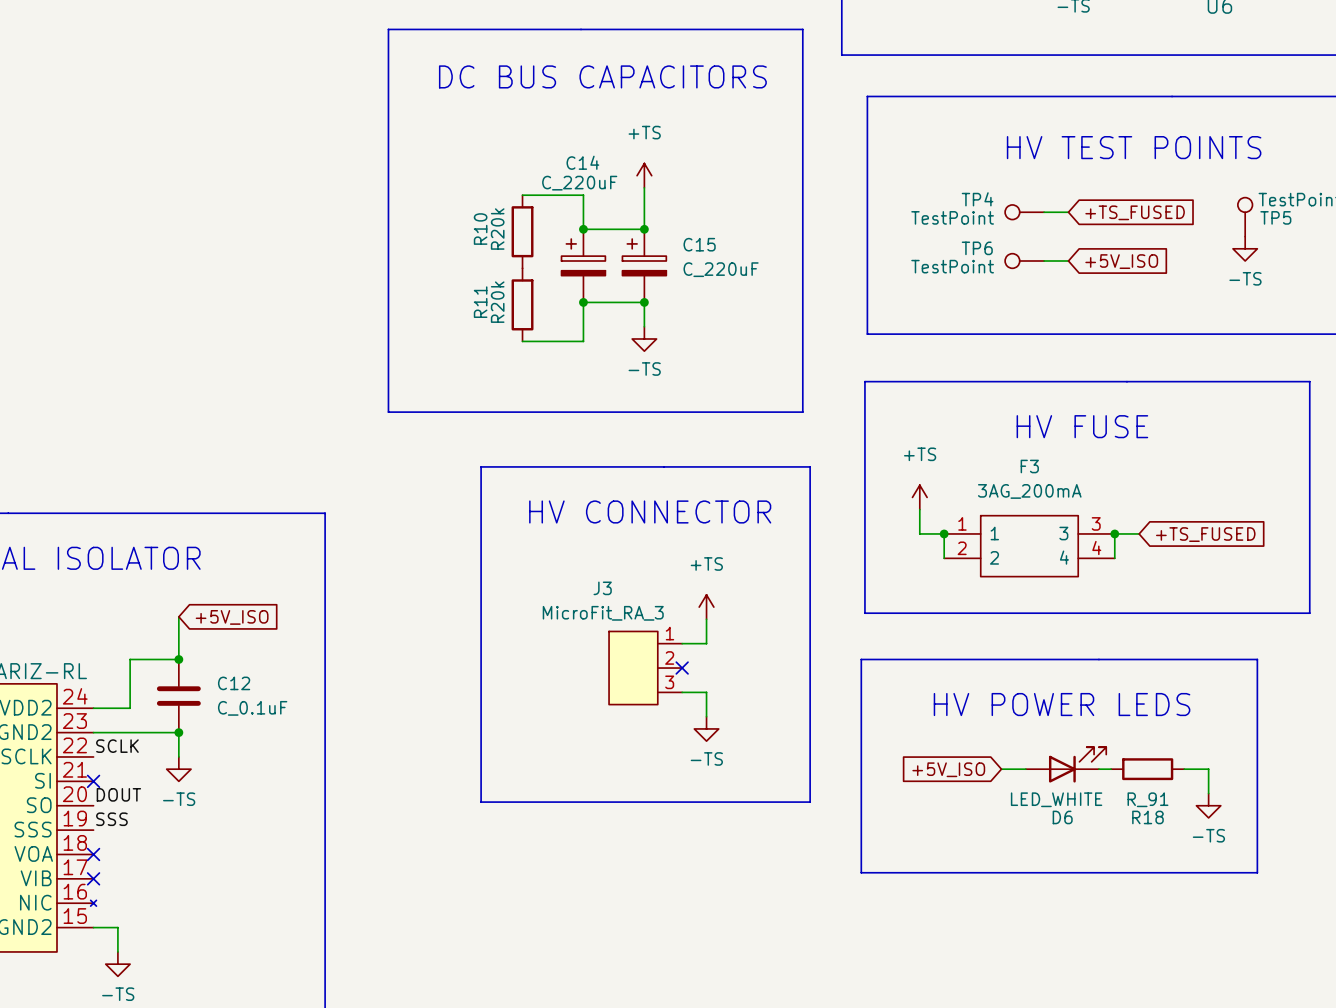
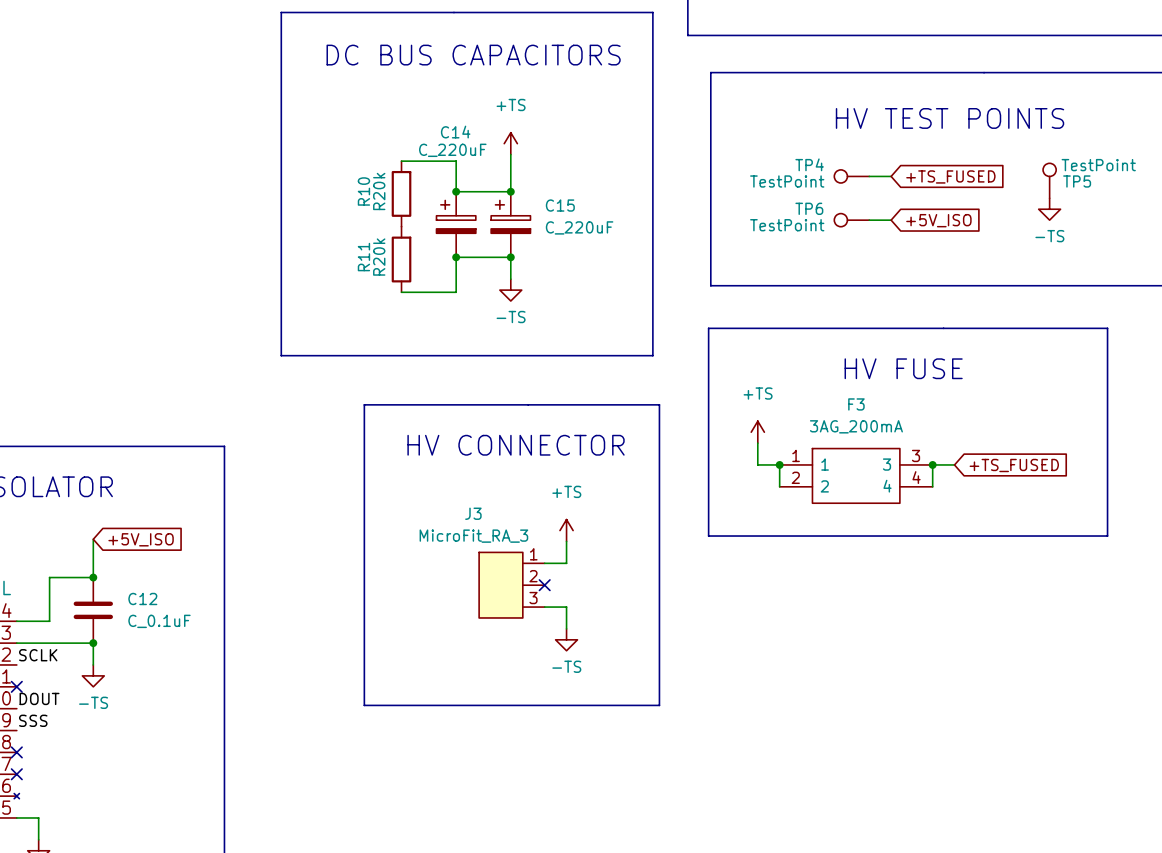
line: (861, 659) (861, 872) (1257, 872) (1257, 659) (861, 659) -> none
text: HV POWER LEDS (1062, 704) -> none
D6: LED_WHITE (1066, 764) -> none
global label: +5V_ISO (948, 769) -> none
wire: (1001, 769) (1025, 769) -> none
wire: (1098, 769) (1111, 769) -> none
R18: R_91 (1147, 769) -> none
wire: (1184, 769) (1208, 769) (1208, 793) -> none
power symbol: -TS (1208, 805) -> none

